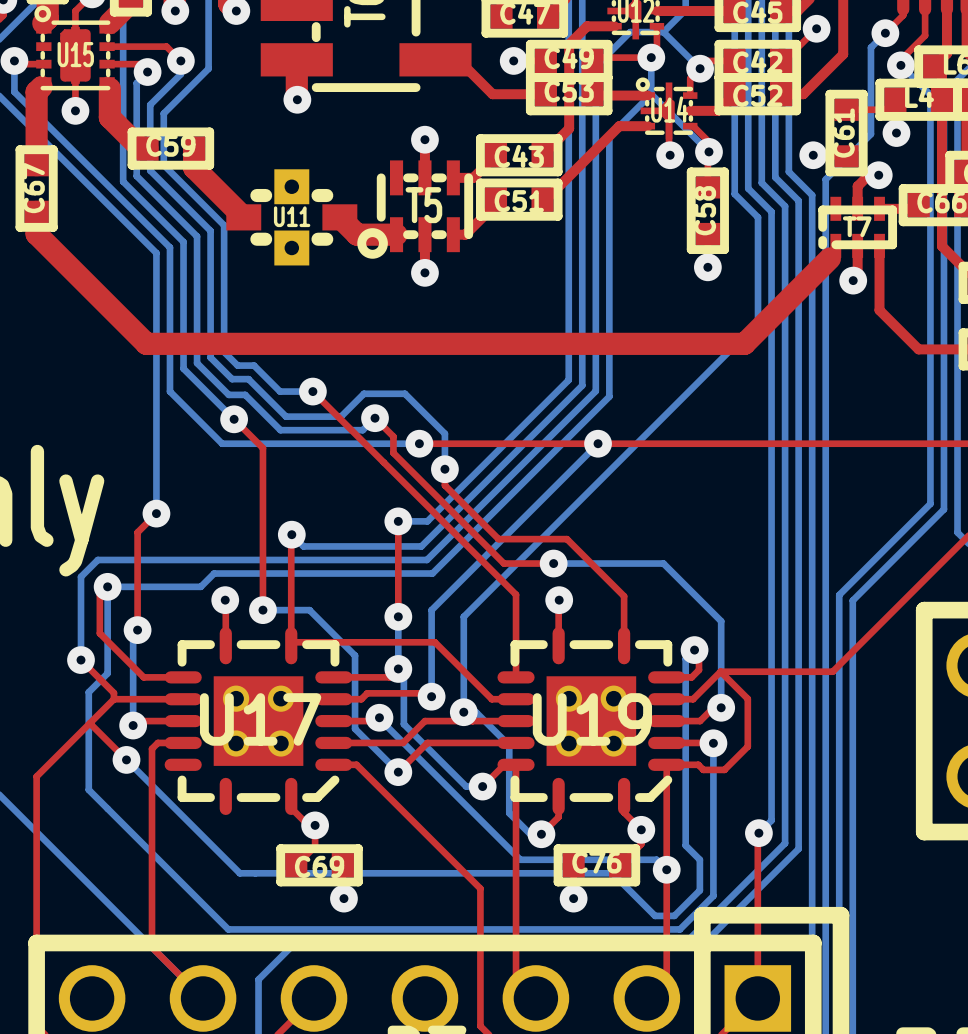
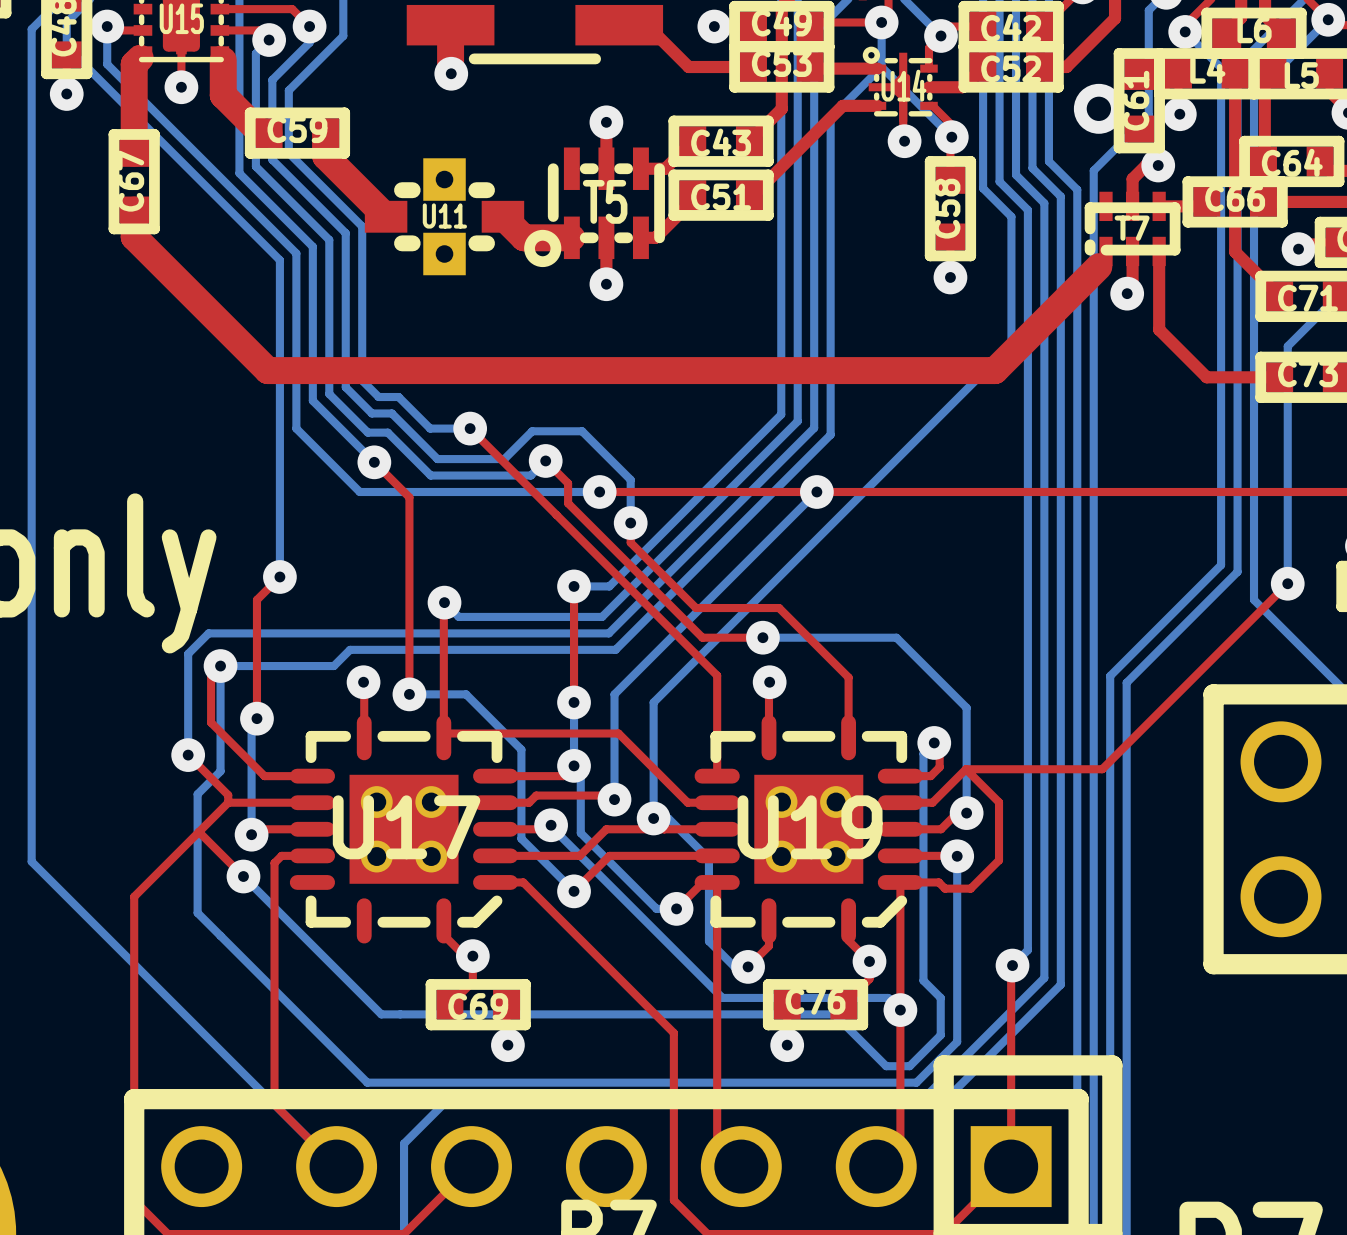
C61 position: (846, 133) -> (1139, 100)
via position: (813, 155) -> (1098, 108)

